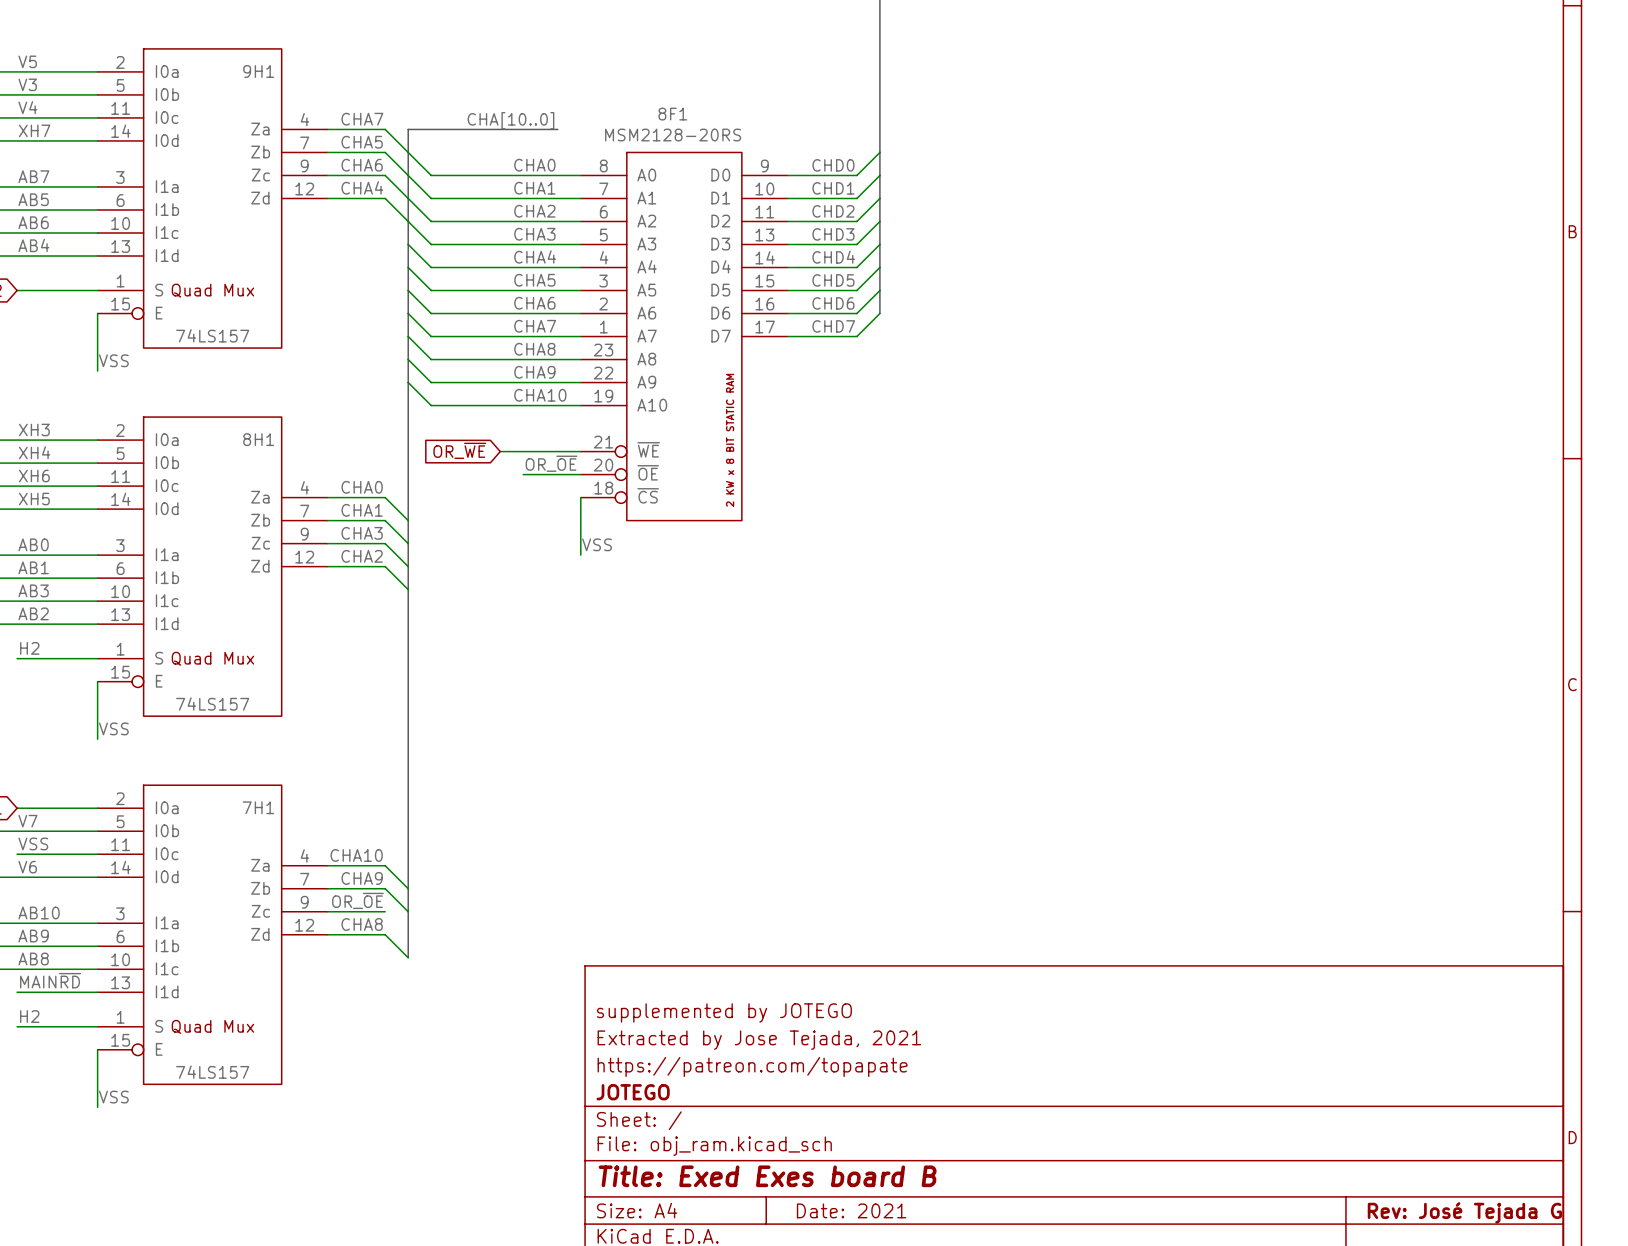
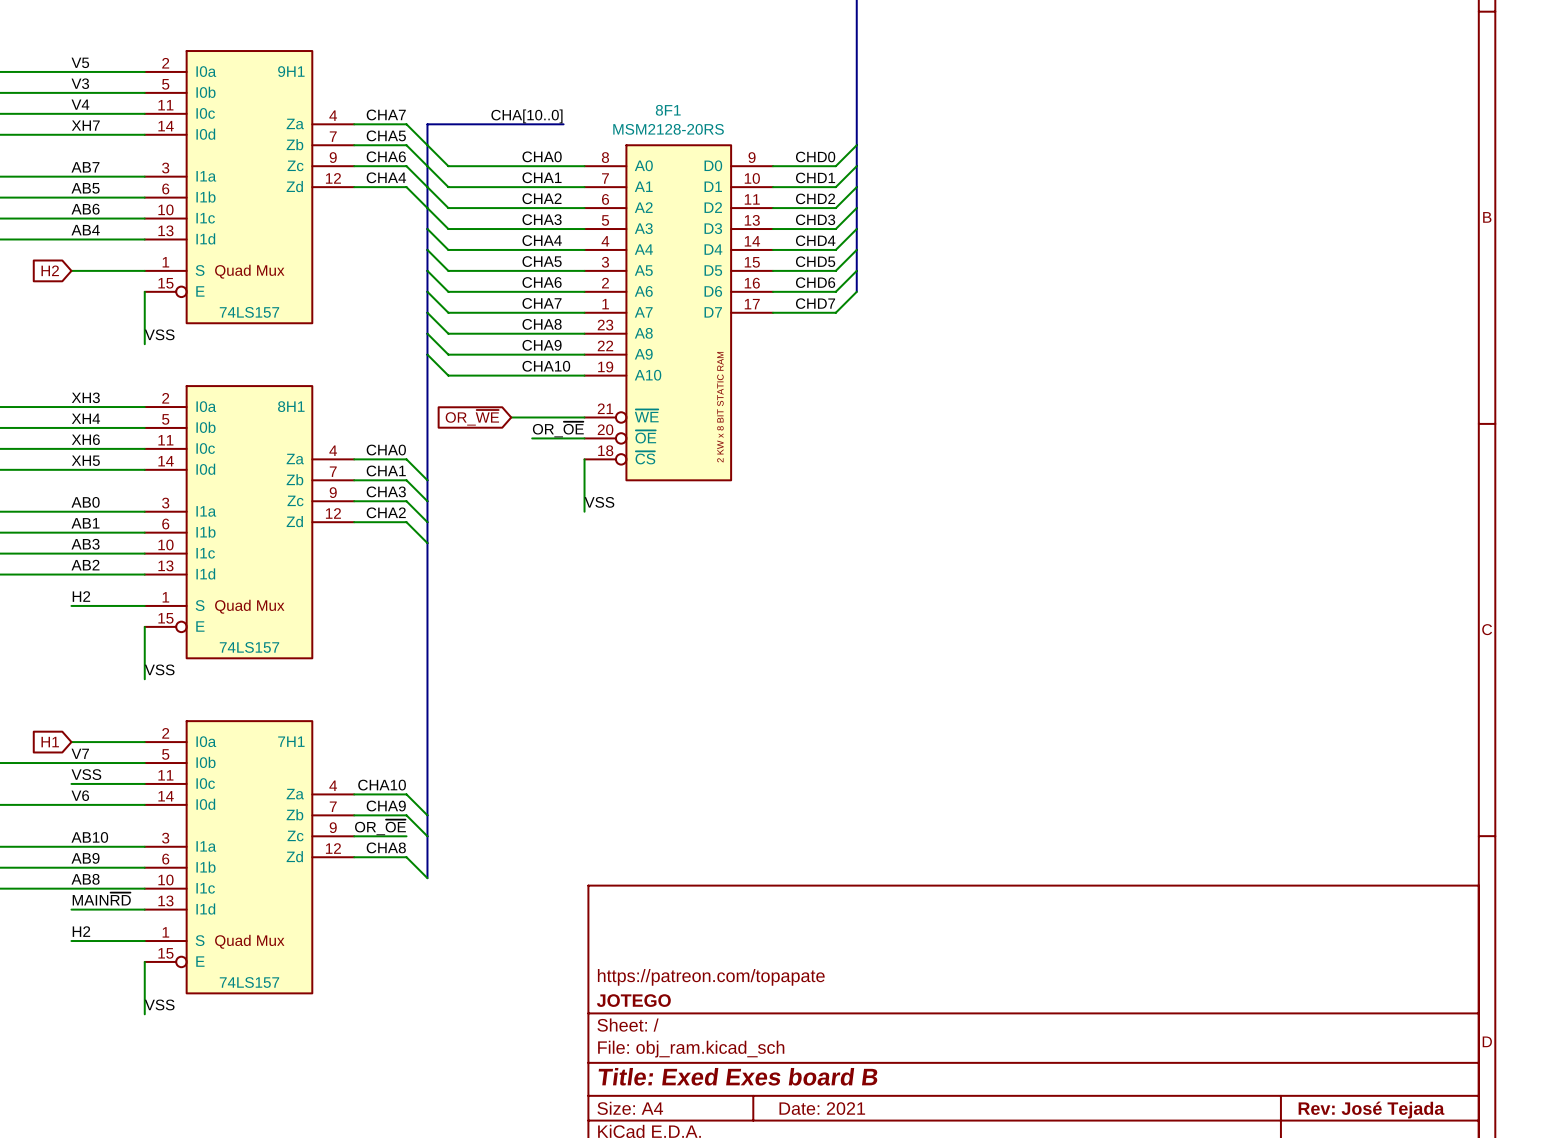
title block: supplemented by JOTEGO (724, 1012) -> none
title block: Extracted by Jose Tejada, 2021 (759, 1040) -> none
title block: Rev: José Tejada G (1464, 1212) -> Rev: José Tejada (1371, 1110)

